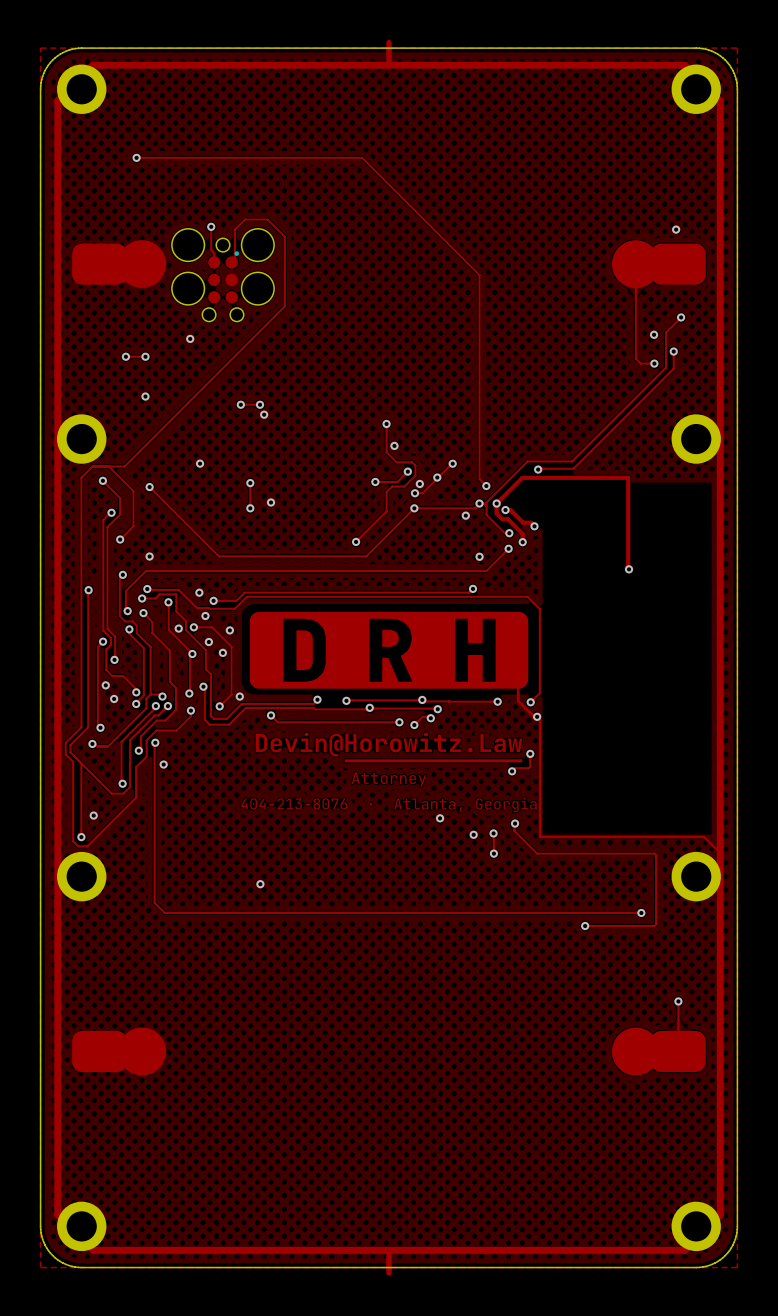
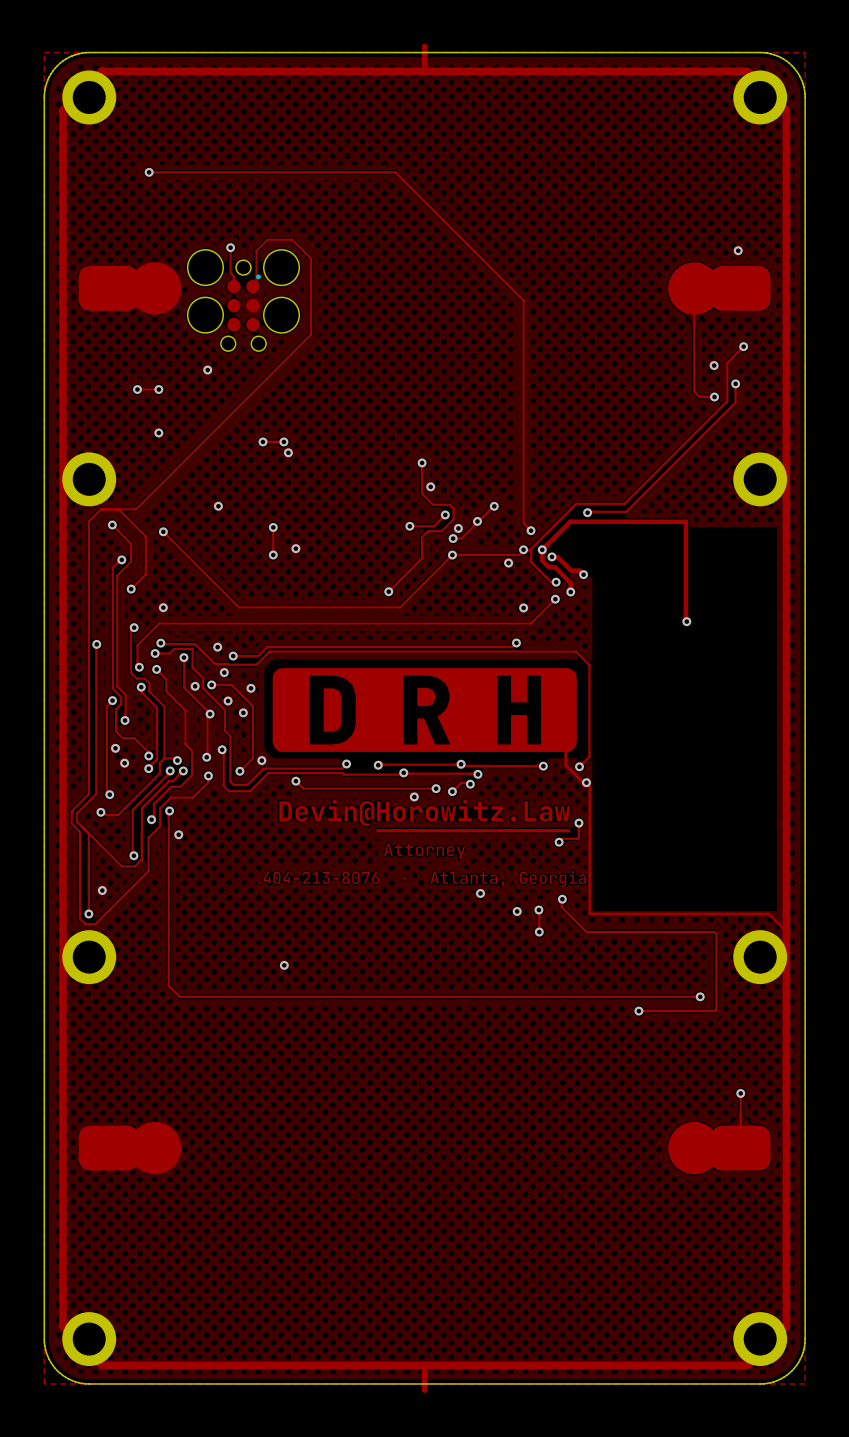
via: none -> (414, 796)

